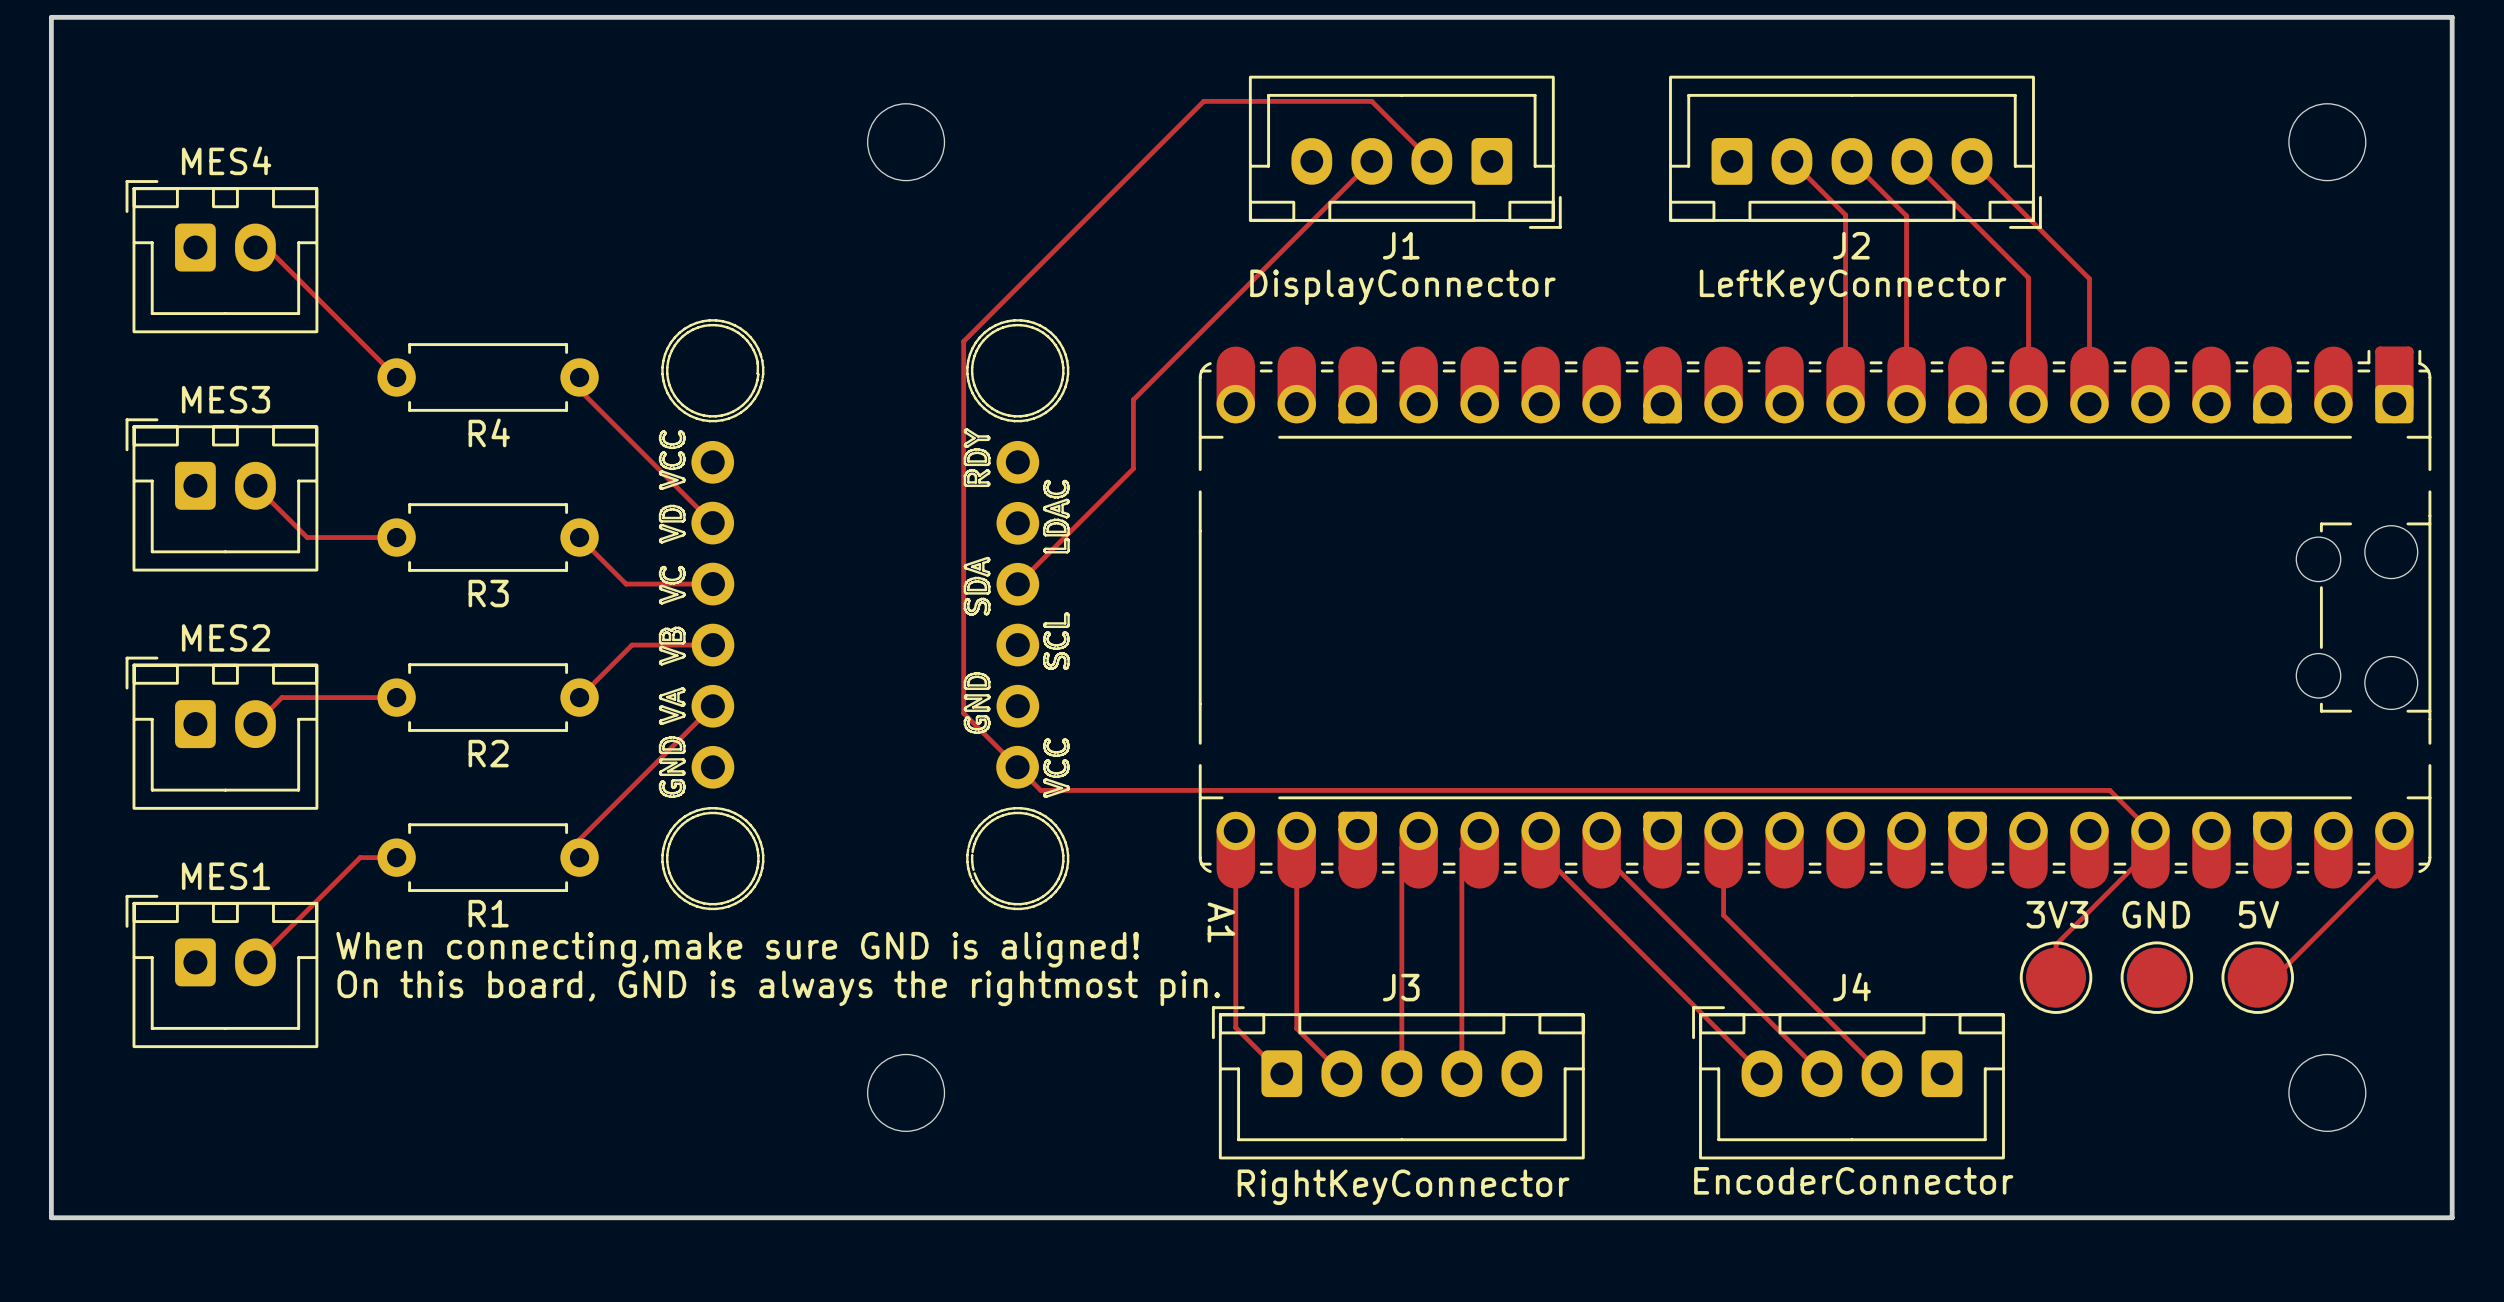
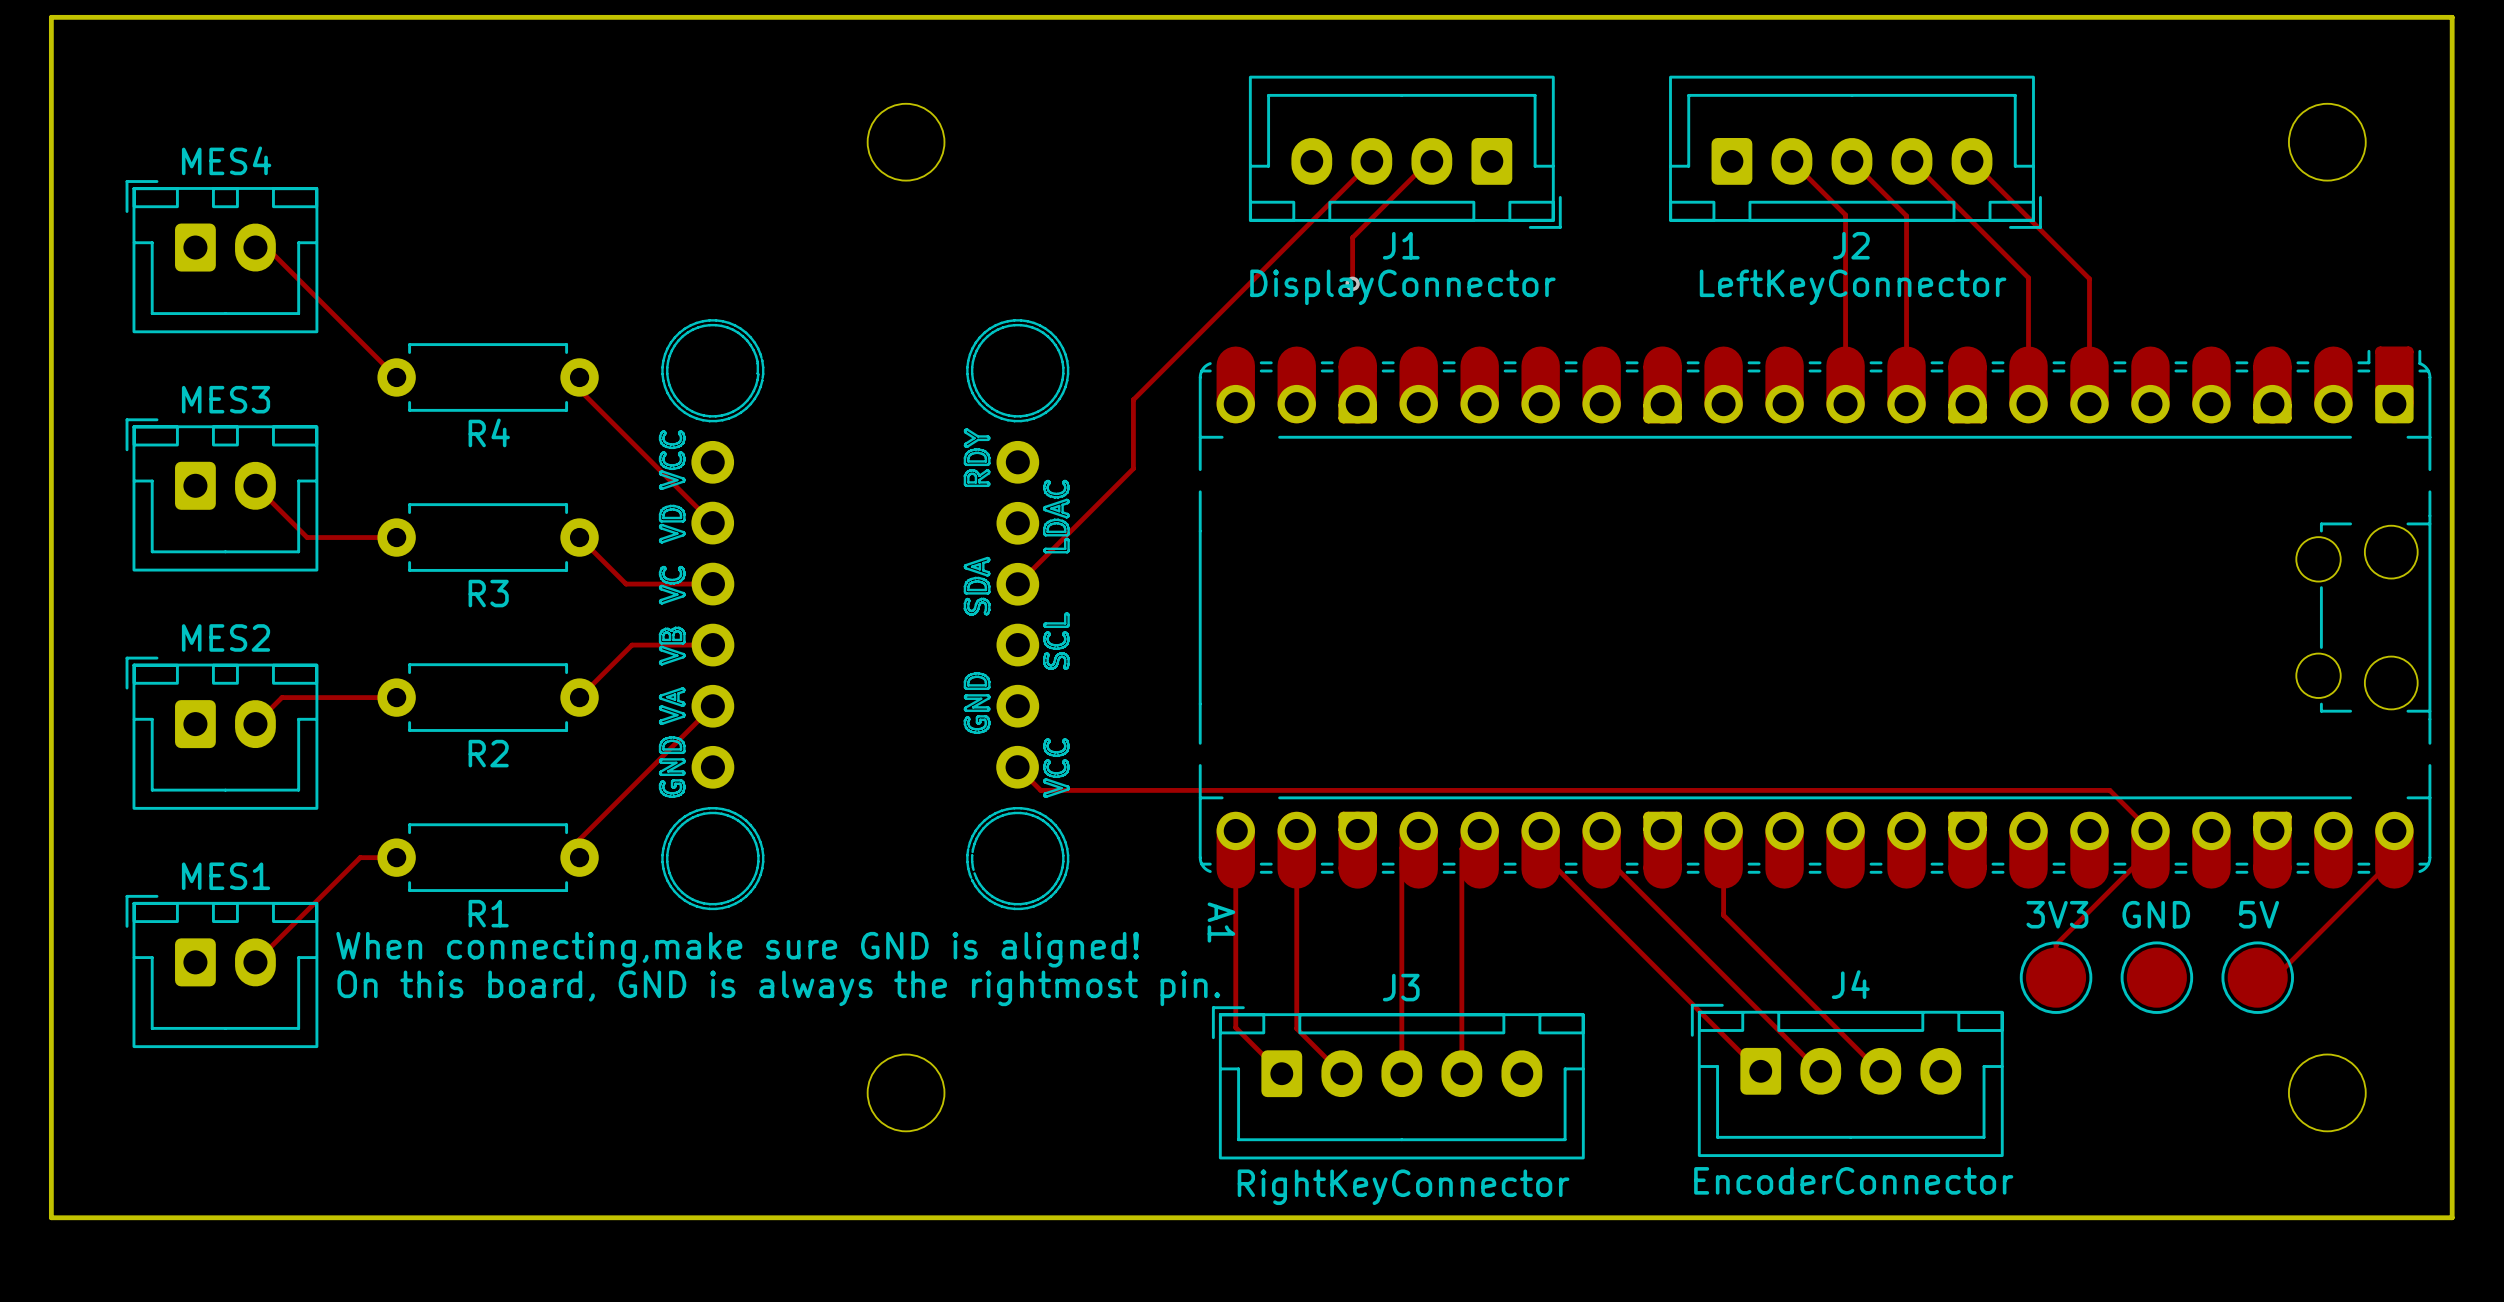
track: (1431, 161) (1371, 101) (1203, 101) (963, 341) (963, 713) (1017, 767) -> (1431, 161) (1428, 161) (1352, 237) (1352, 283)
via: none -> (1352, 283)
J4 footprint: [1692, 1006, 2005, 1160] -> [1690, 1003, 2004, 1158]

